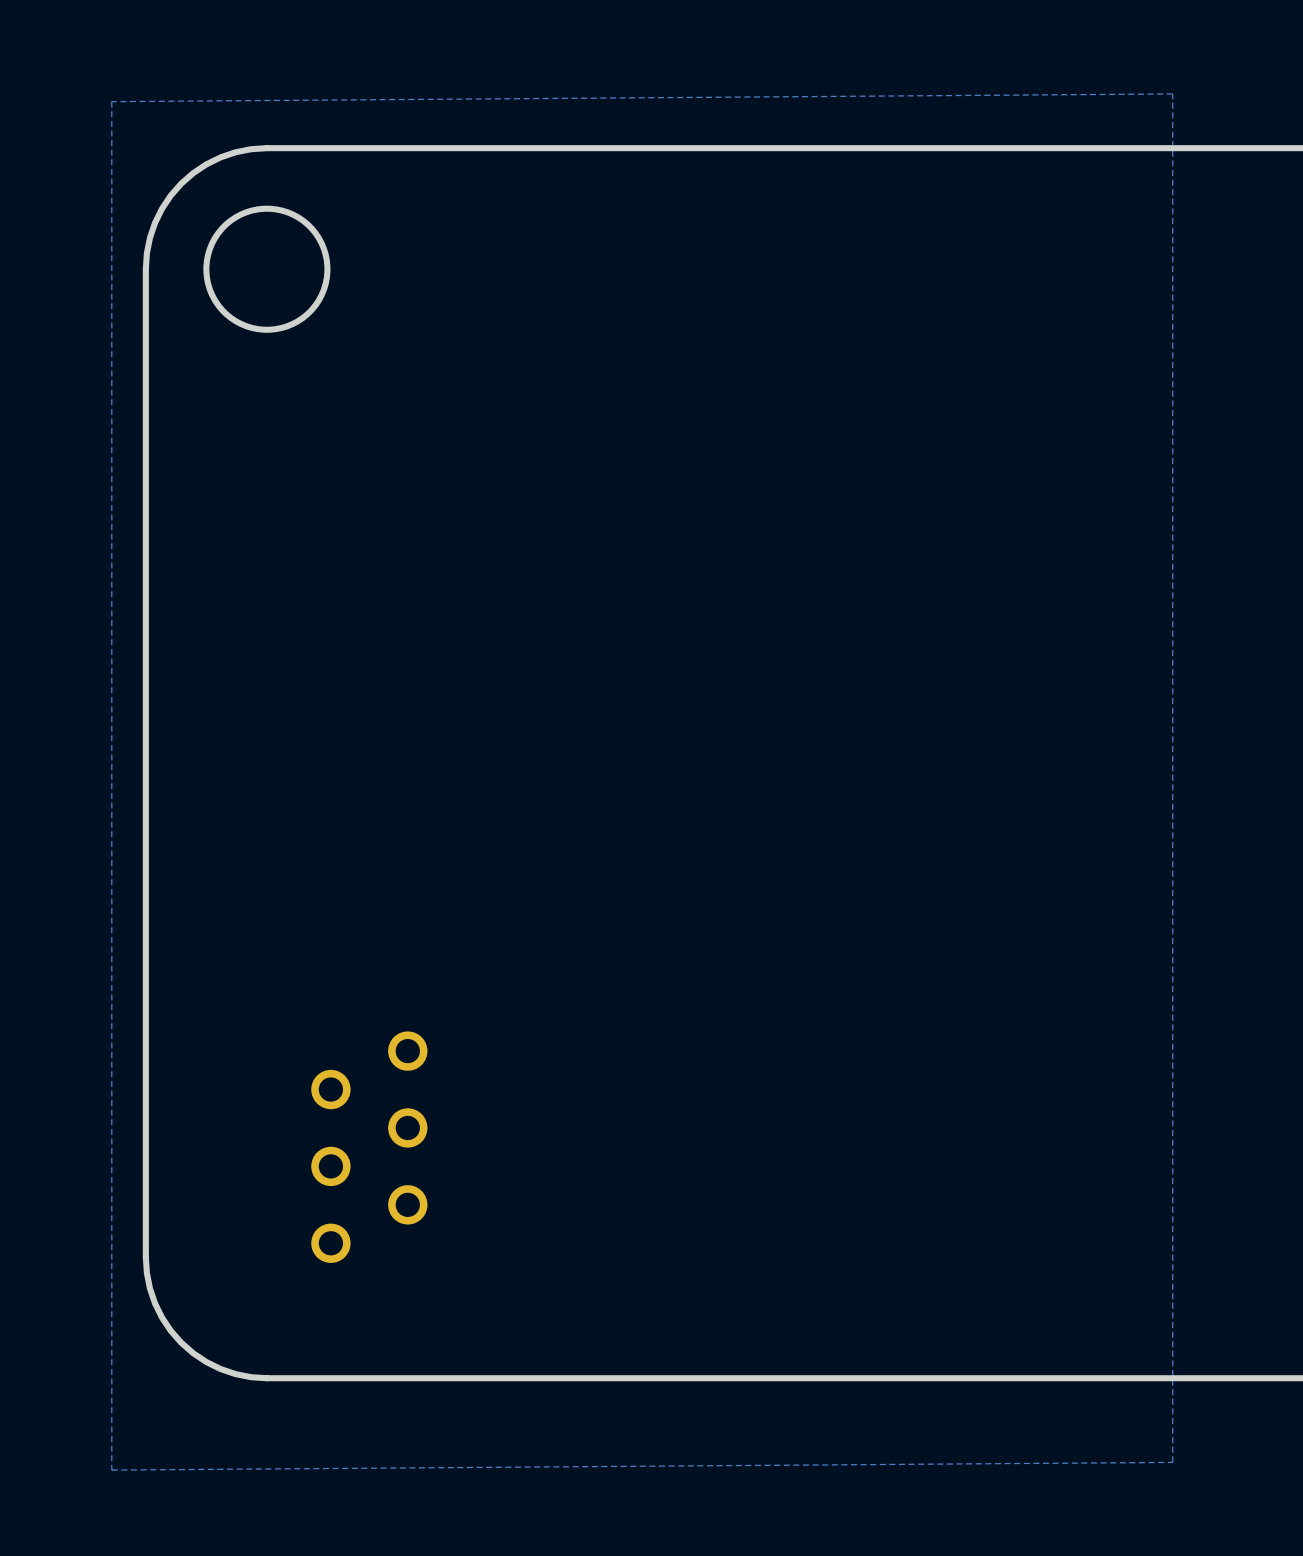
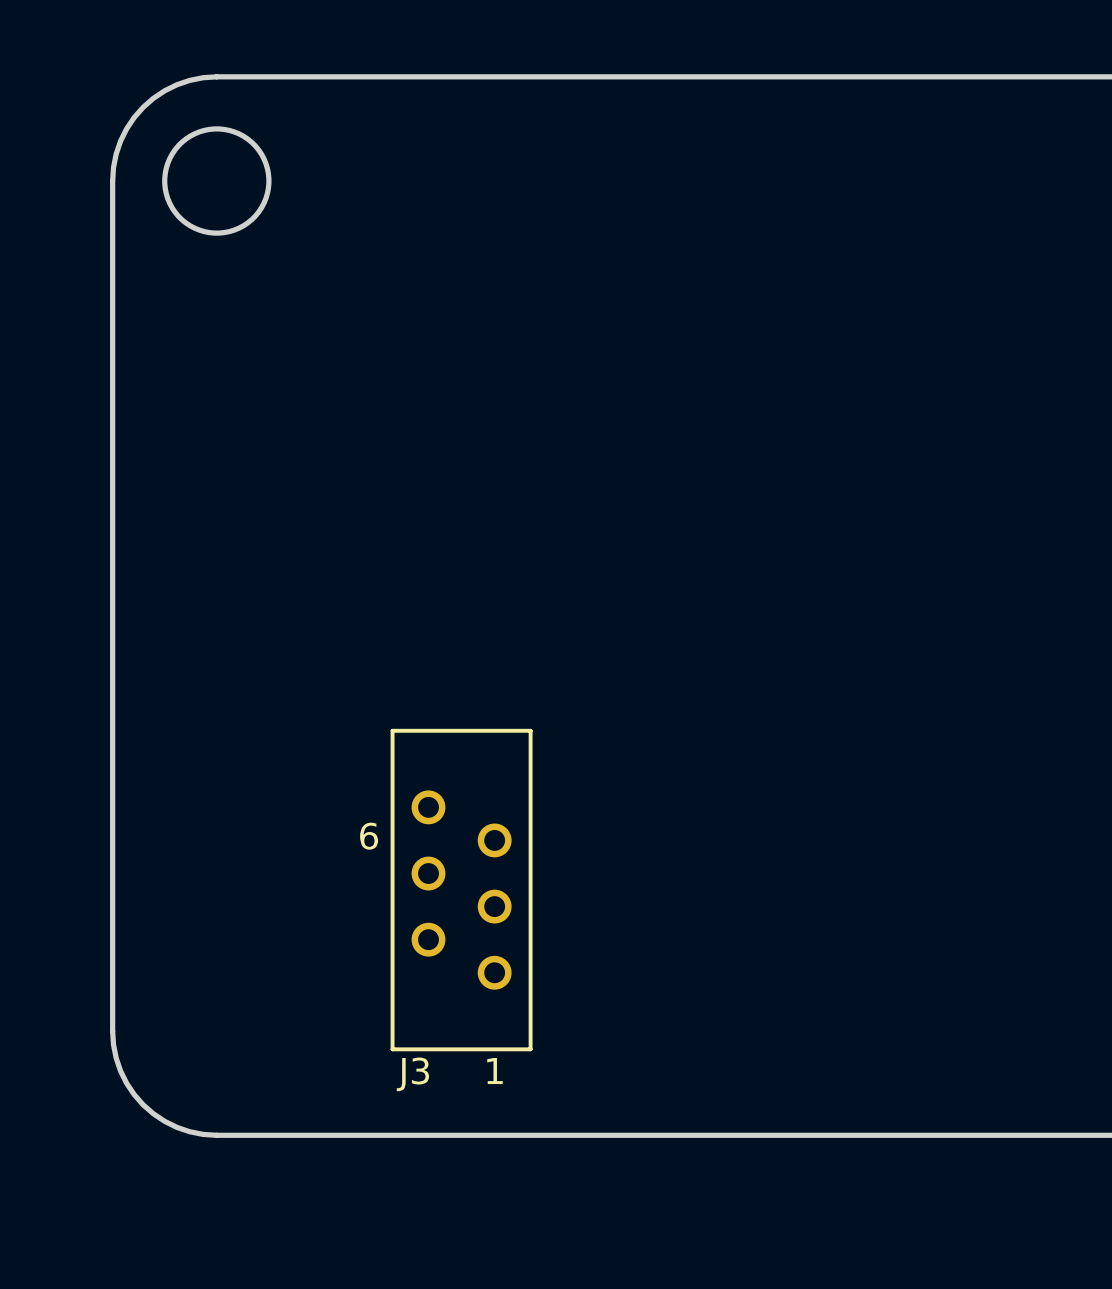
zone outline: (1172, 93) (111, 101) (111, 1470) (1172, 1462) (1172, 93) -> none
J3 side: top (369, 1147) -> bottom (461, 890)

